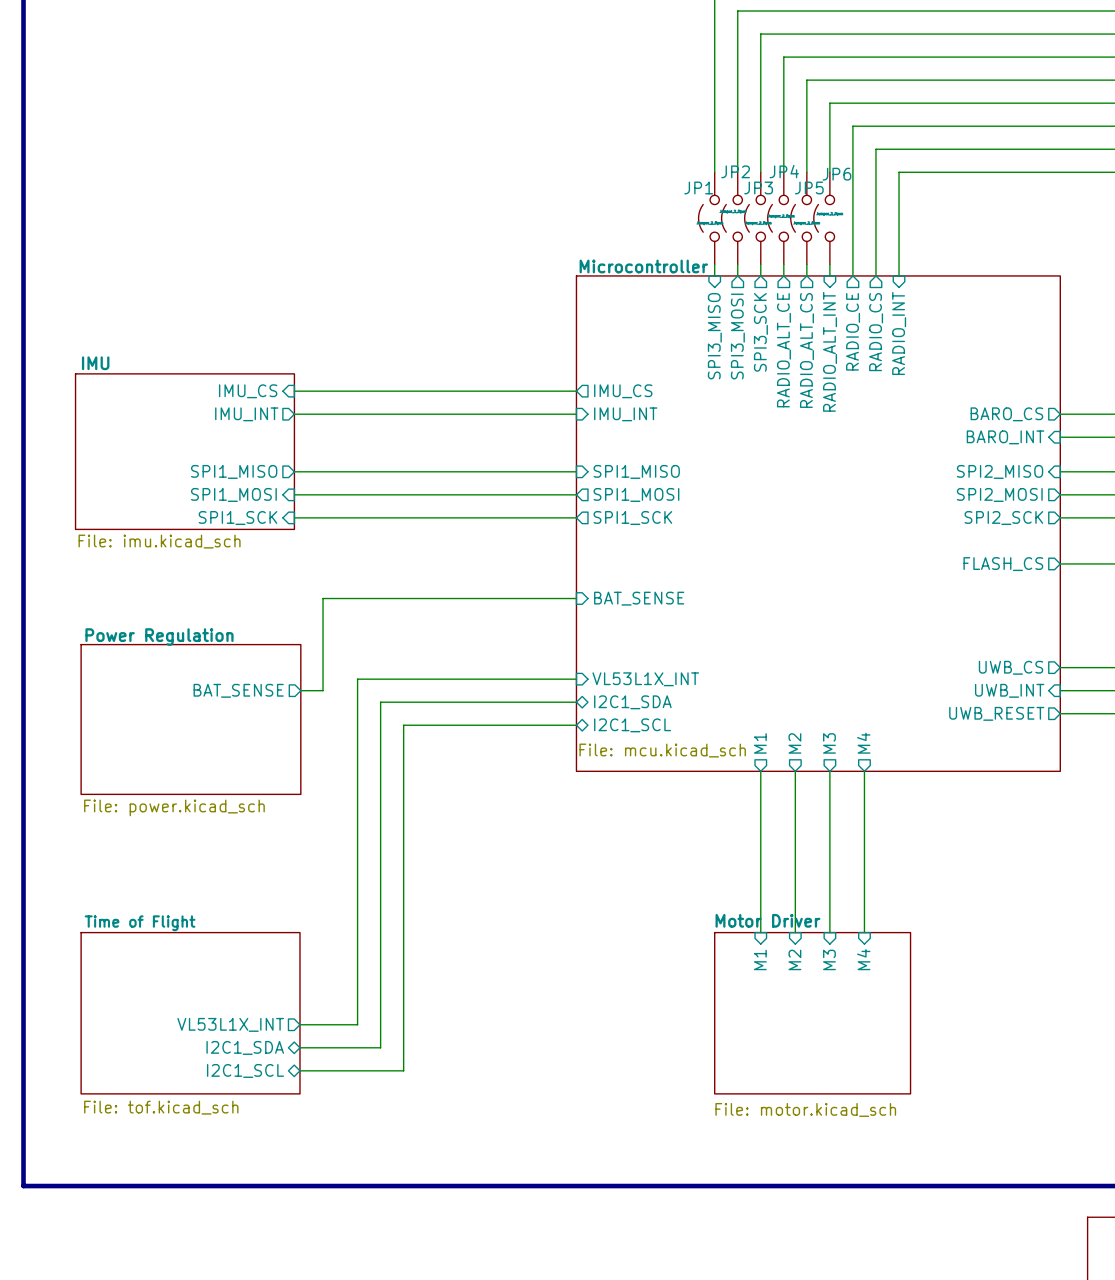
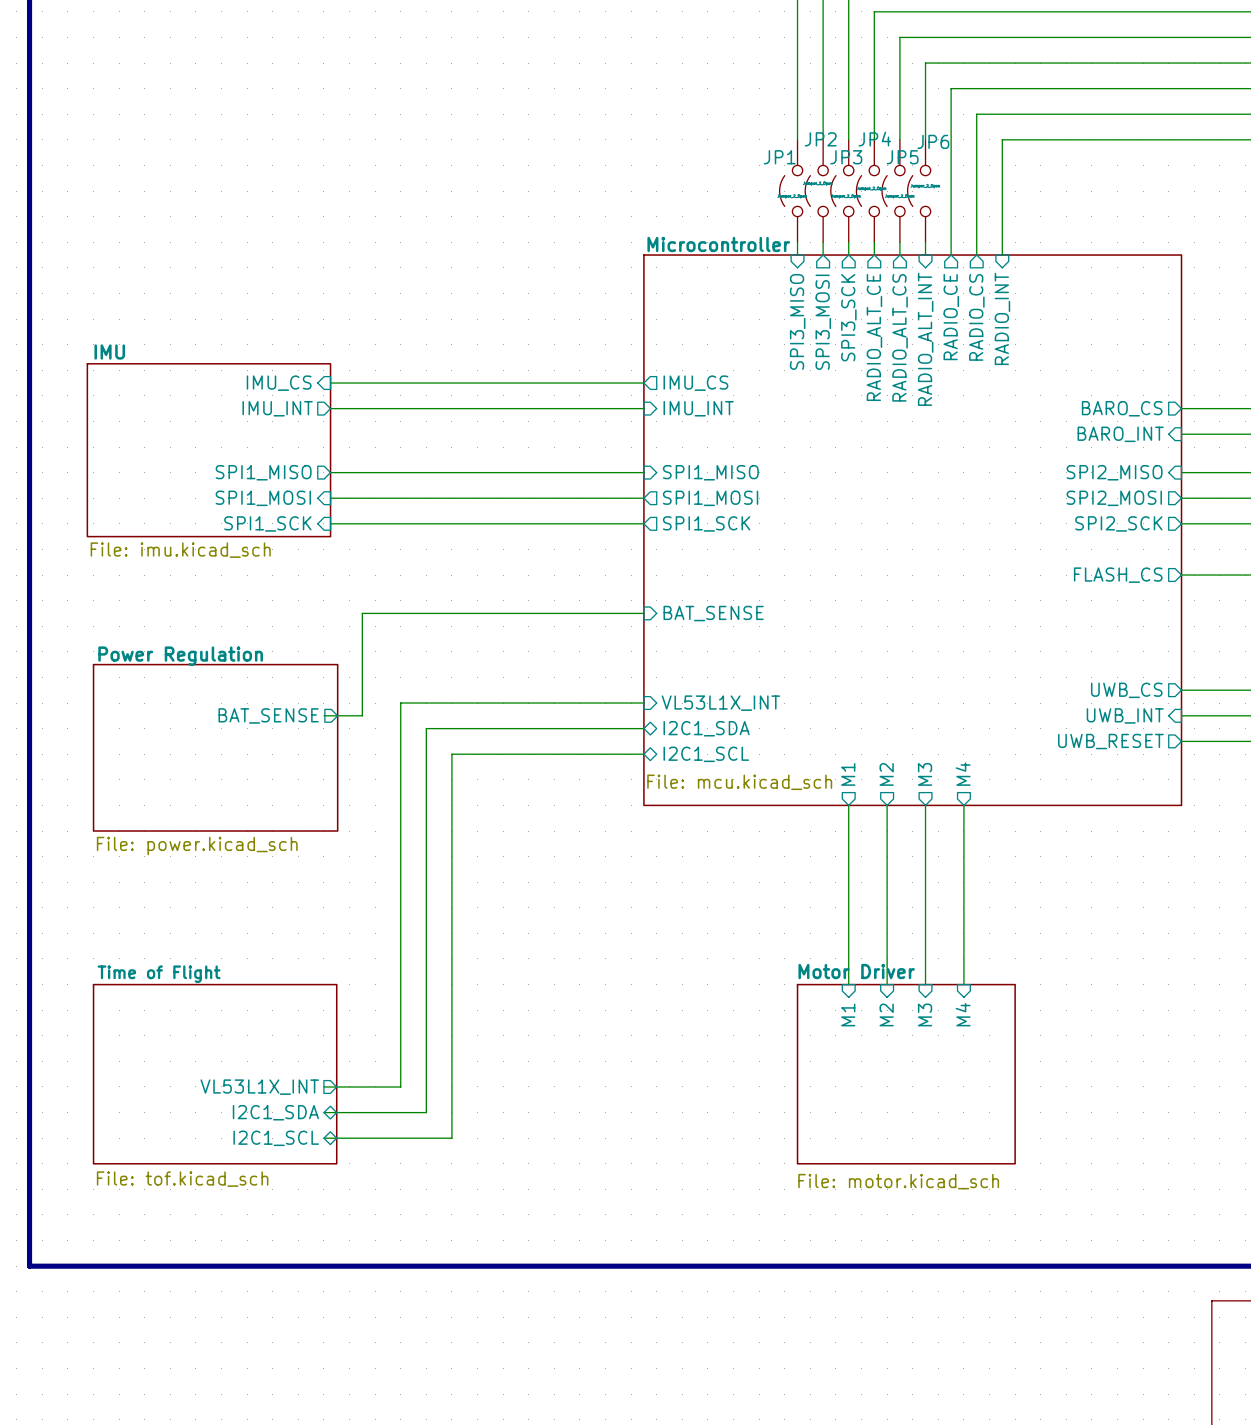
wire: none -> (323, 715) (337, 715)
wire: none -> (323, 1086) (336, 1086)
wire: none -> (323, 1112) (336, 1112)
wire: none -> (323, 1138) (336, 1138)

